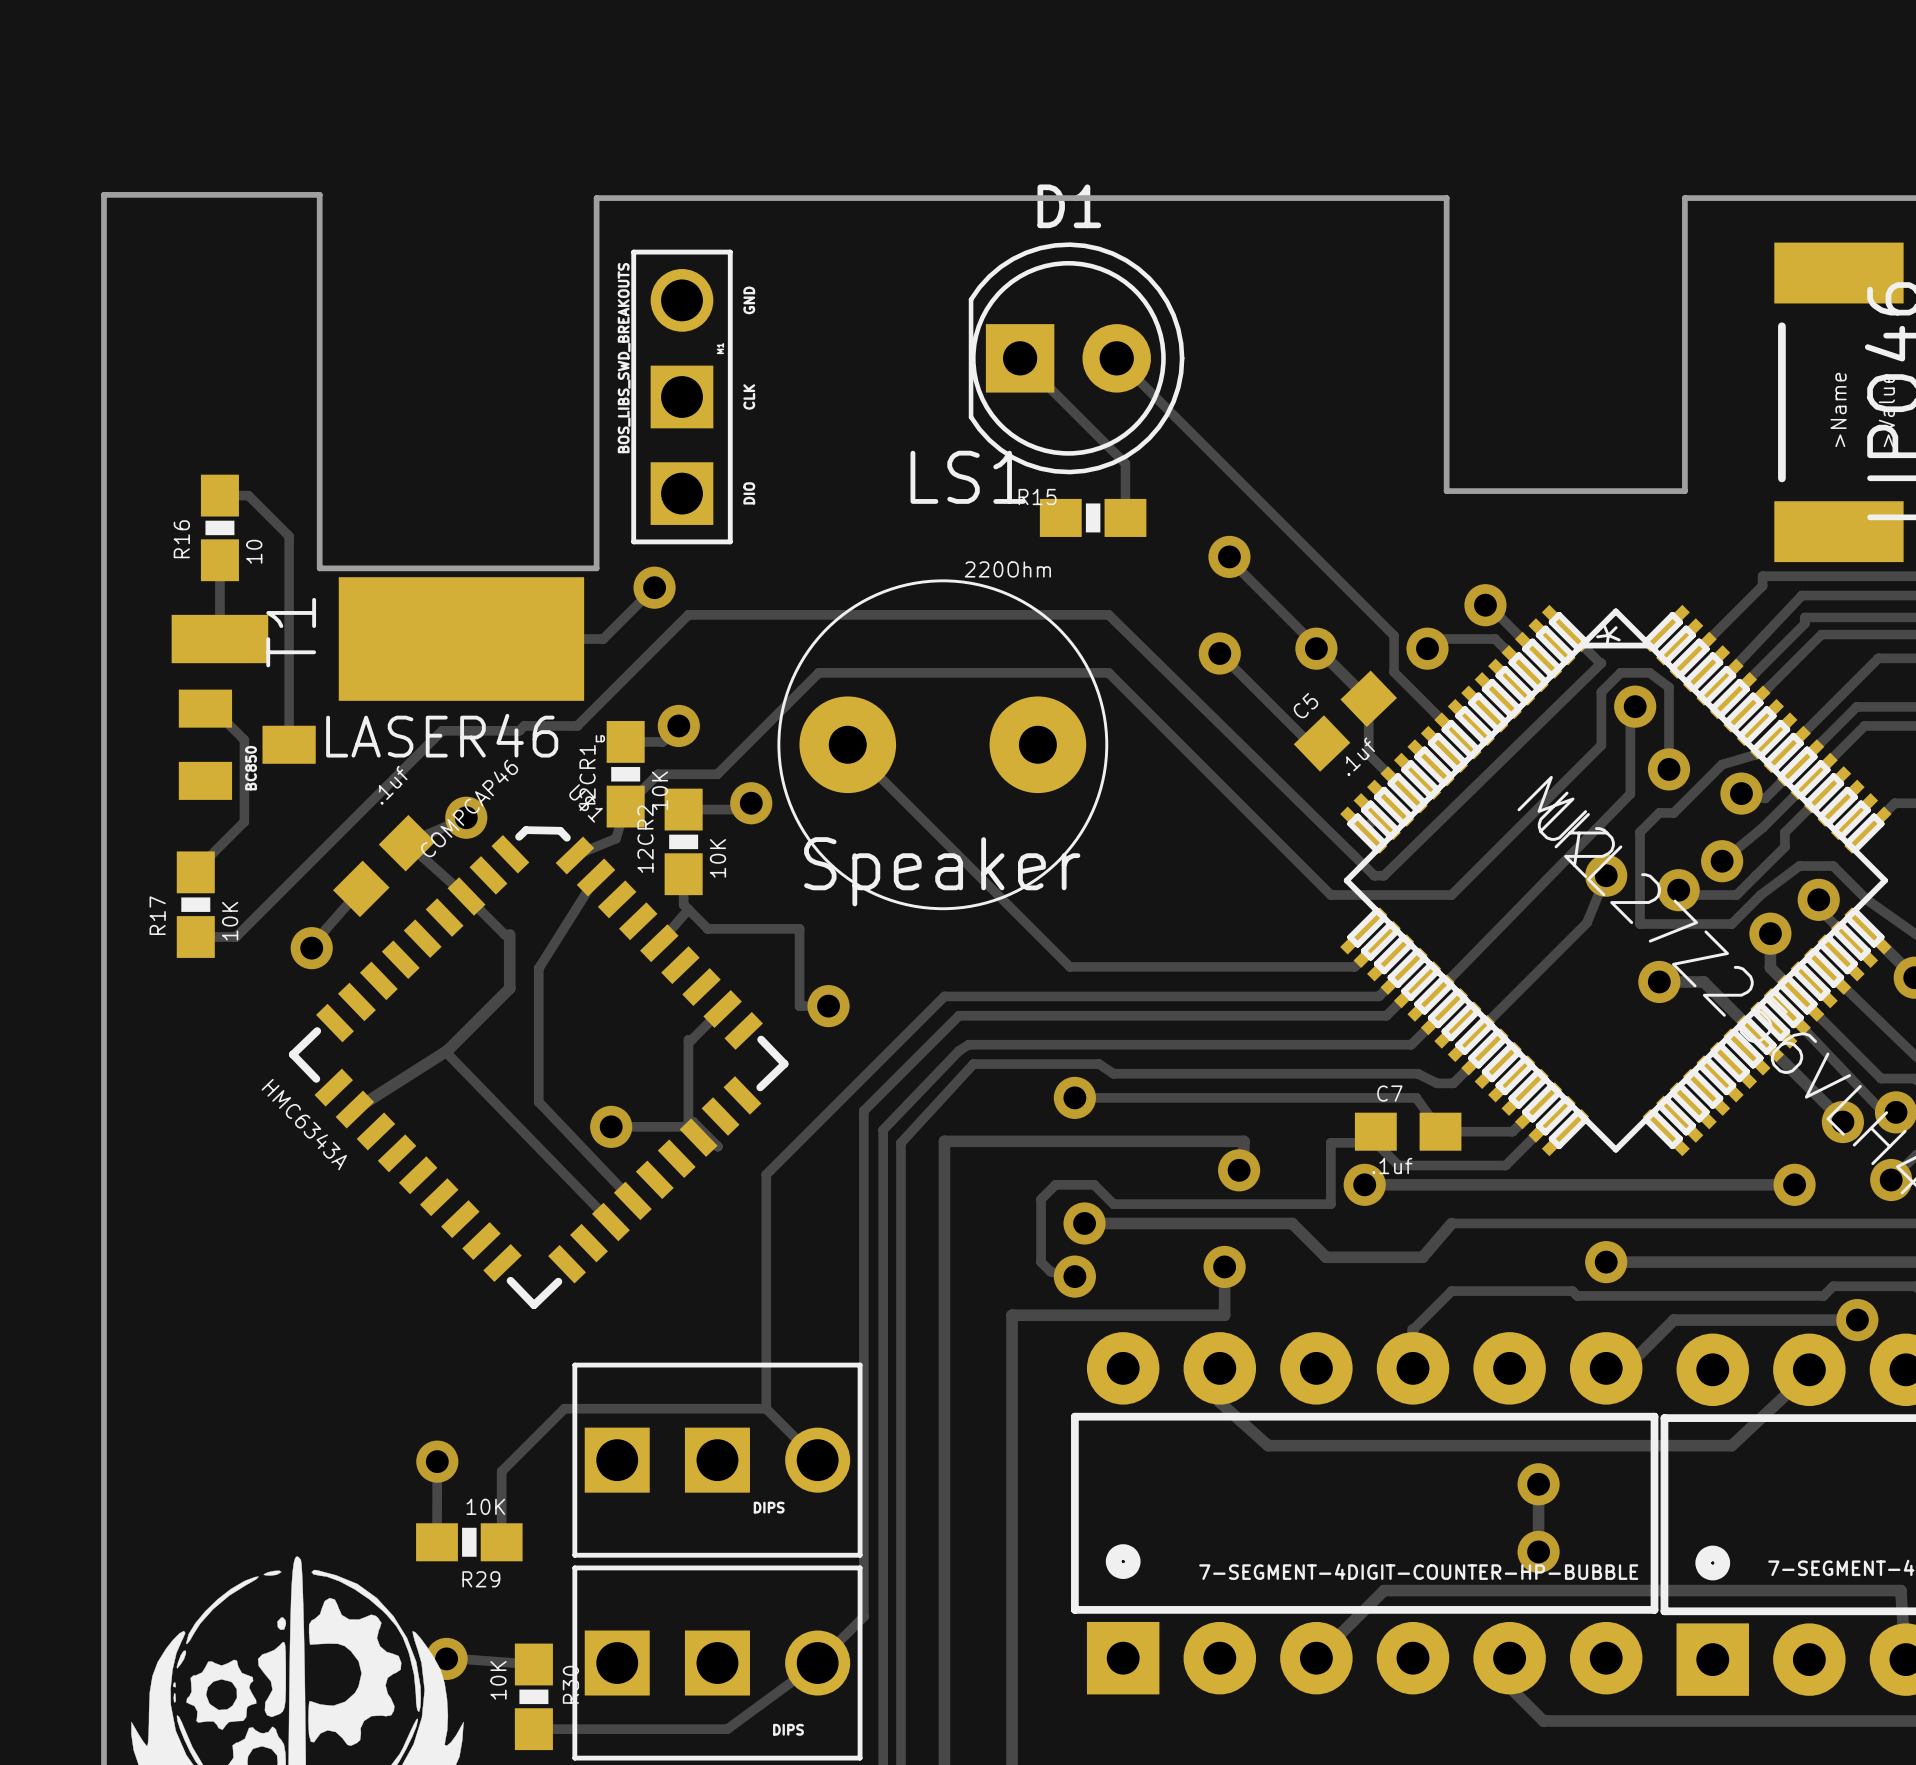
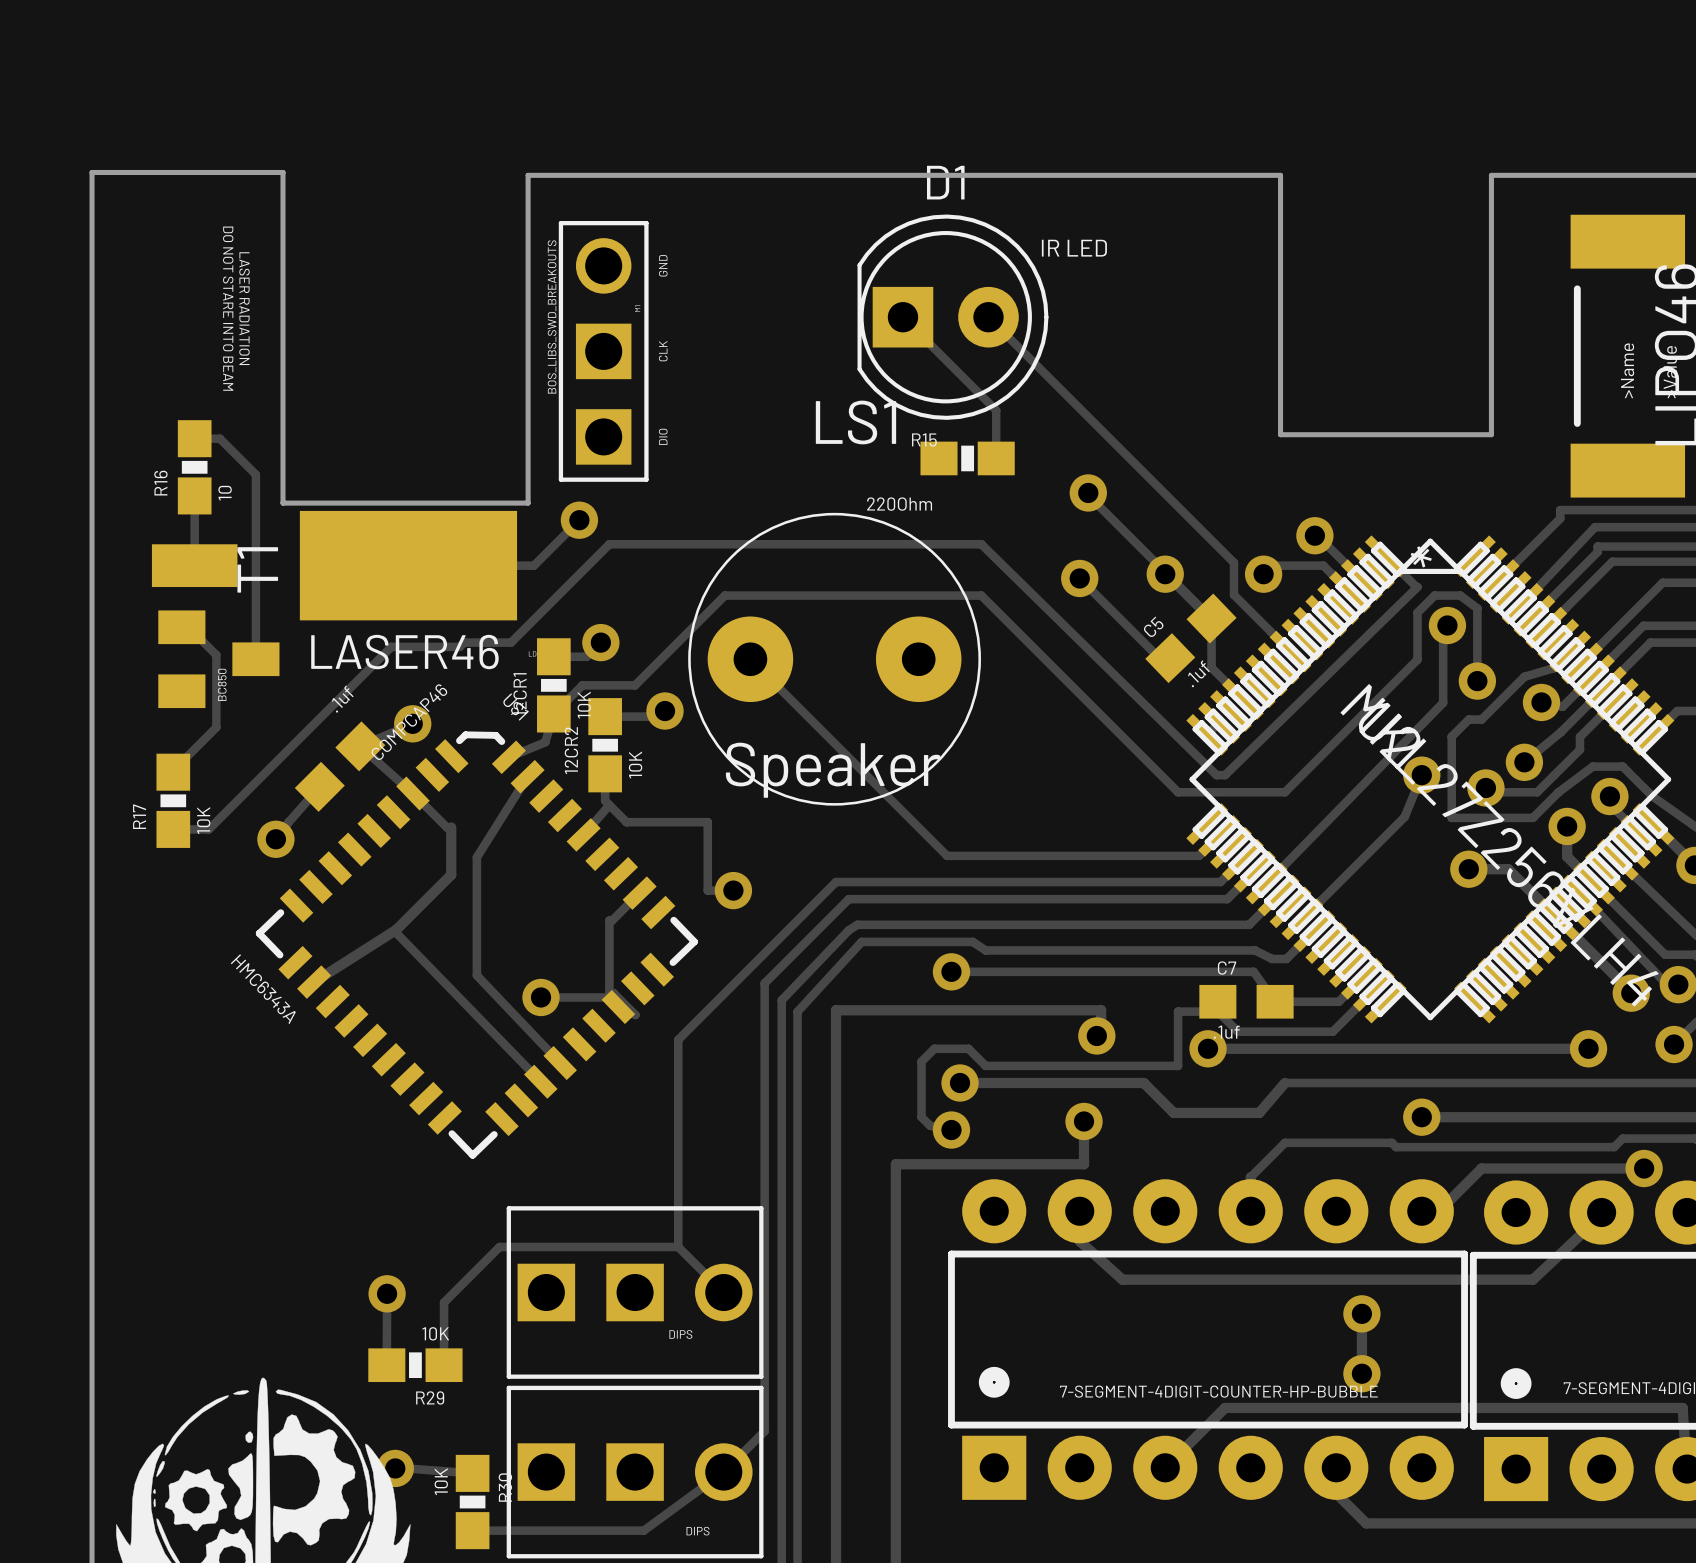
text: none -> IR LED (1074, 248)
text: none -> DO NOT STARE INTO BEAM (228, 308)
text: none -> LASER RADIATION (244, 308)

